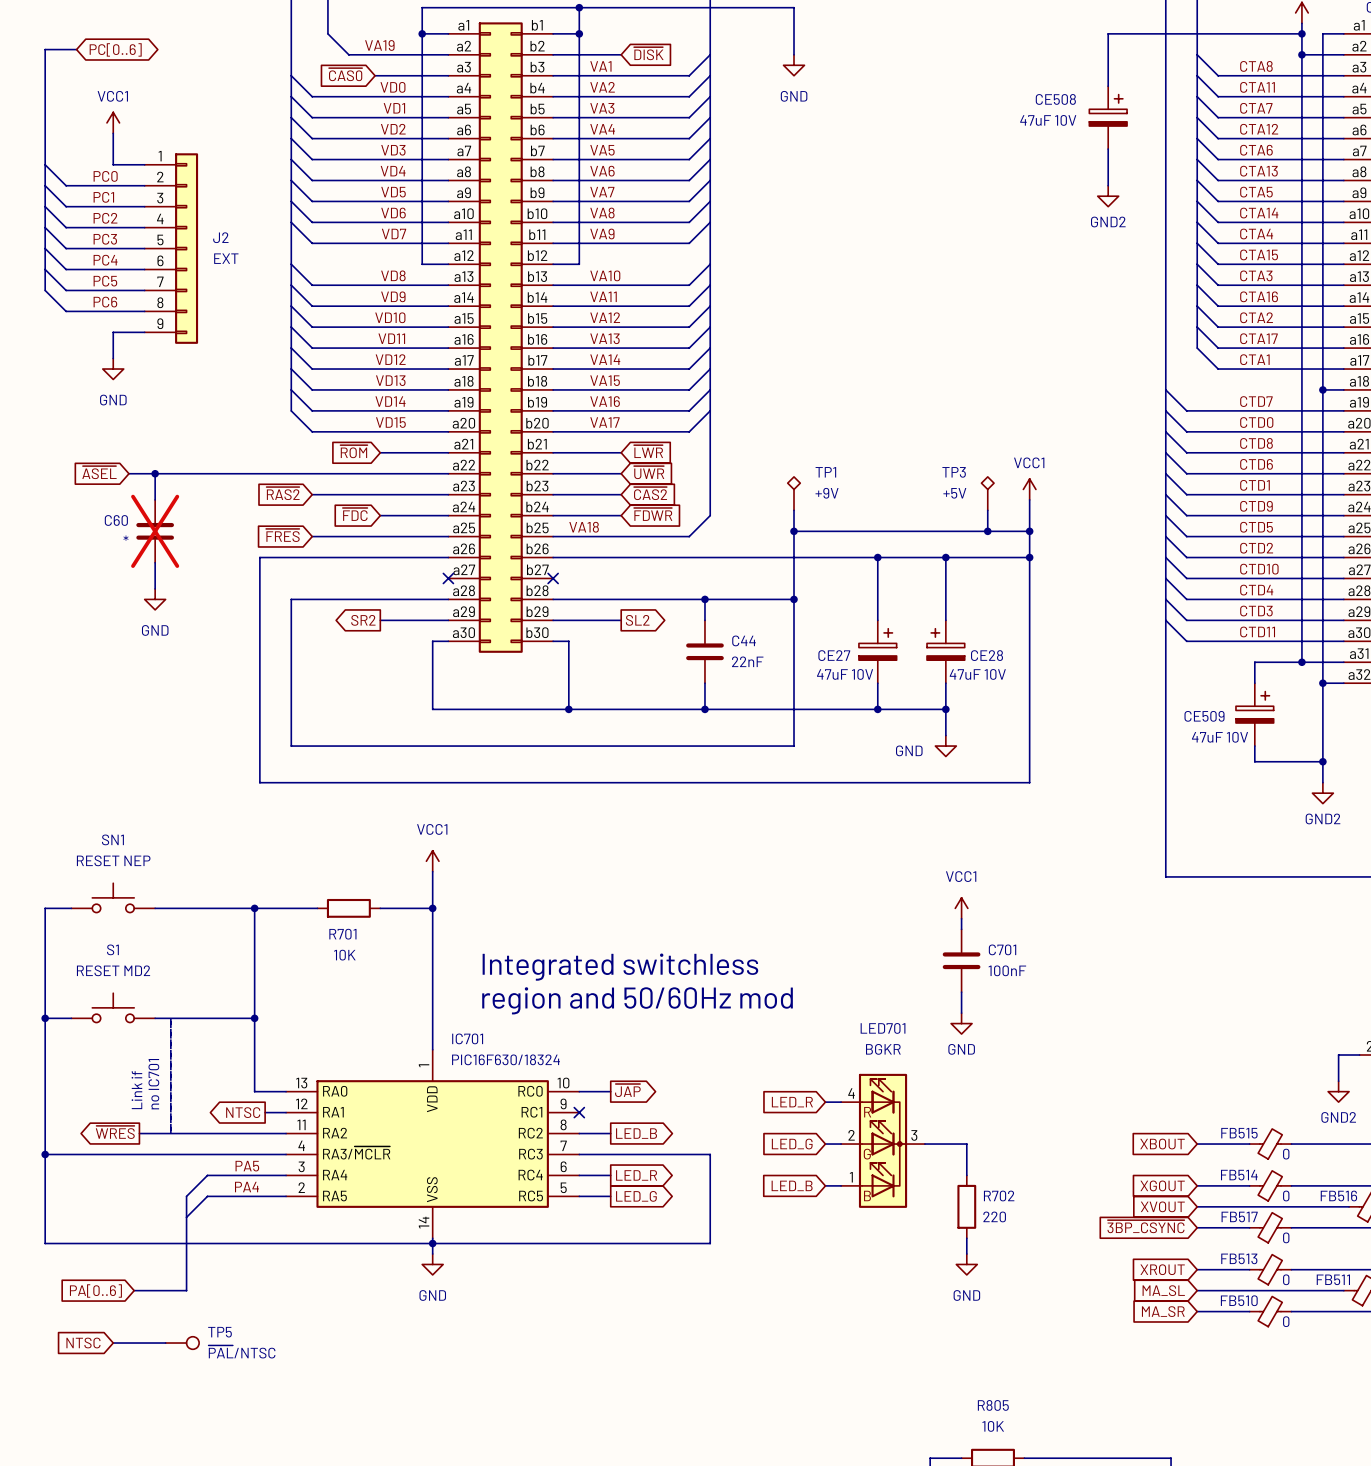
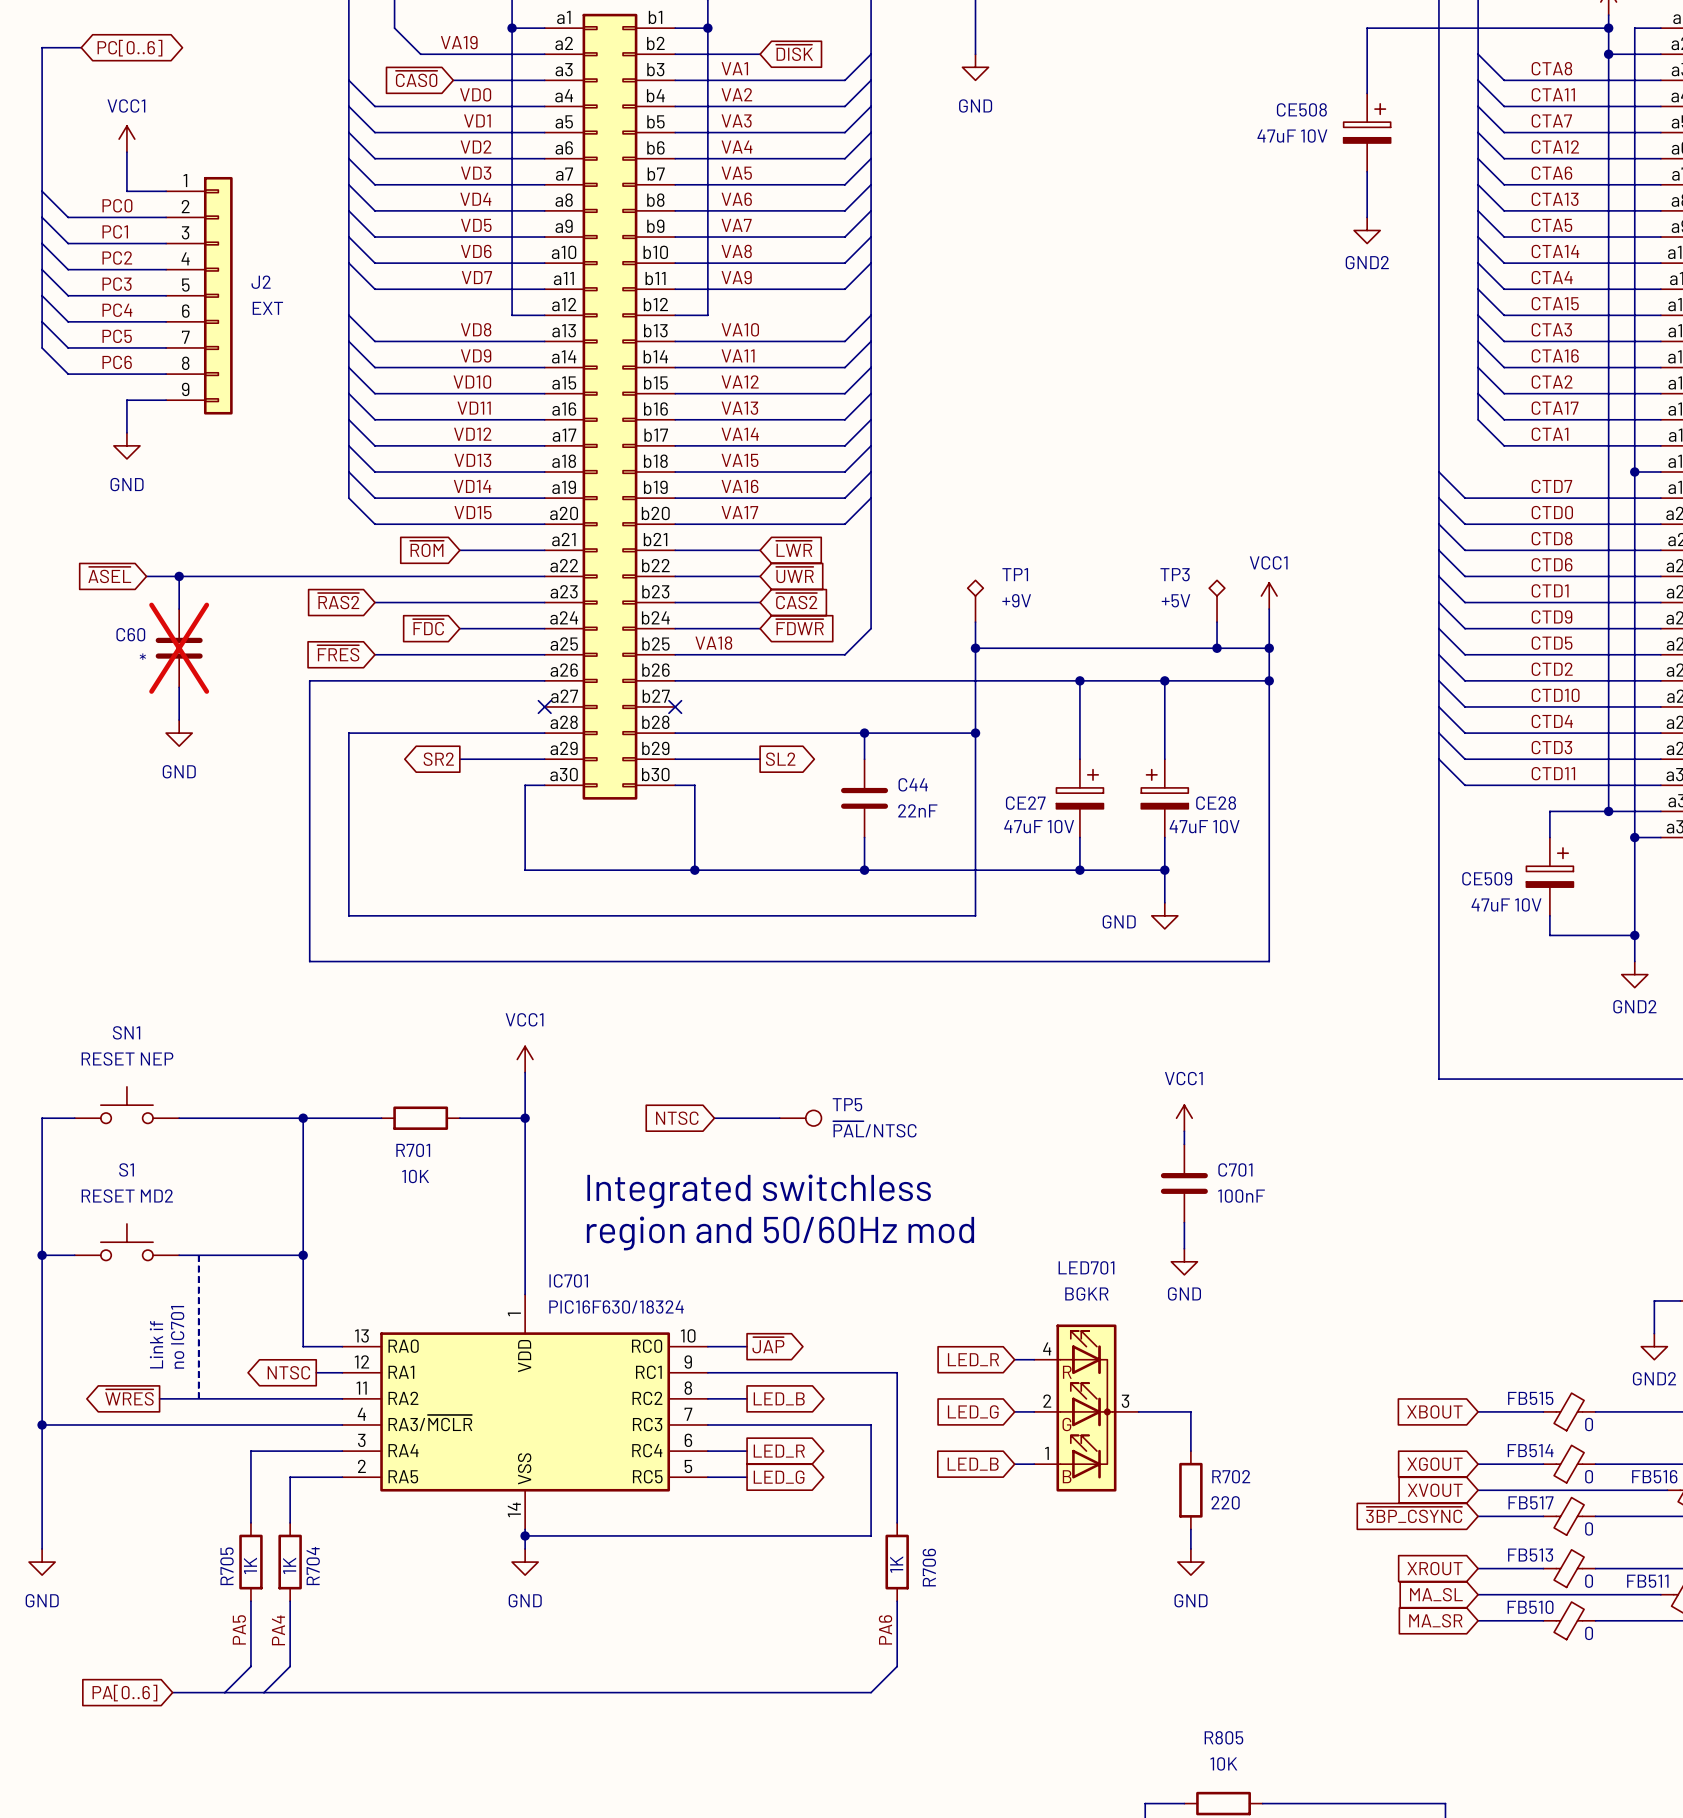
global label: none -> NTSC (677, 1118)
wire: none -> (714, 1118) (779, 1118)
wire: none -> (707, 1372) (897, 1372) (897, 1522)
no-connect mark: (579, 1112) -> none
label rotation: 0° (247, 1166) -> 90° counterclockwise (239, 1629)
label position: PA5 (247, 1166) -> PA5 (239, 1629)
wire: (212, 1175) (207, 1175) (186, 1196) -> (250, 1451) (250, 1522)
label rotation: 0° (246, 1187) -> 90° counterclockwise (278, 1630)
label position: PA4 (246, 1187) -> PA4 (278, 1630)
bus: (186, 1196) (186, 1290) (134, 1290) -> none
wire: (244, 1196) (207, 1196) (186, 1217) -> (290, 1477) (290, 1522)
wire: (45, 1243) (432, 1243) -> (42, 1535) (42, 1549)
power symbol: none -> GND (42, 1562)
R705: none -> 1K (250, 1562)
R704: none -> 1K (290, 1562)
R706: none -> 1K (897, 1562)
global label position: PA[0..6] (95, 1290) -> PA[0..6] (124, 1693)
wire: none -> (250, 1601) (250, 1666) (224, 1692)
wire: none -> (290, 1601) (290, 1666) (264, 1692)
wire: none -> (897, 1601) (897, 1666) (871, 1692)
label: none -> PA6 (885, 1629)
global label: NTSC (83, 1343) -> none
wire: (113, 1343) (165, 1343) -> none
TP5 position: (182, 1343) -> (800, 1118)
bus: none -> (172, 1692) (871, 1692)

